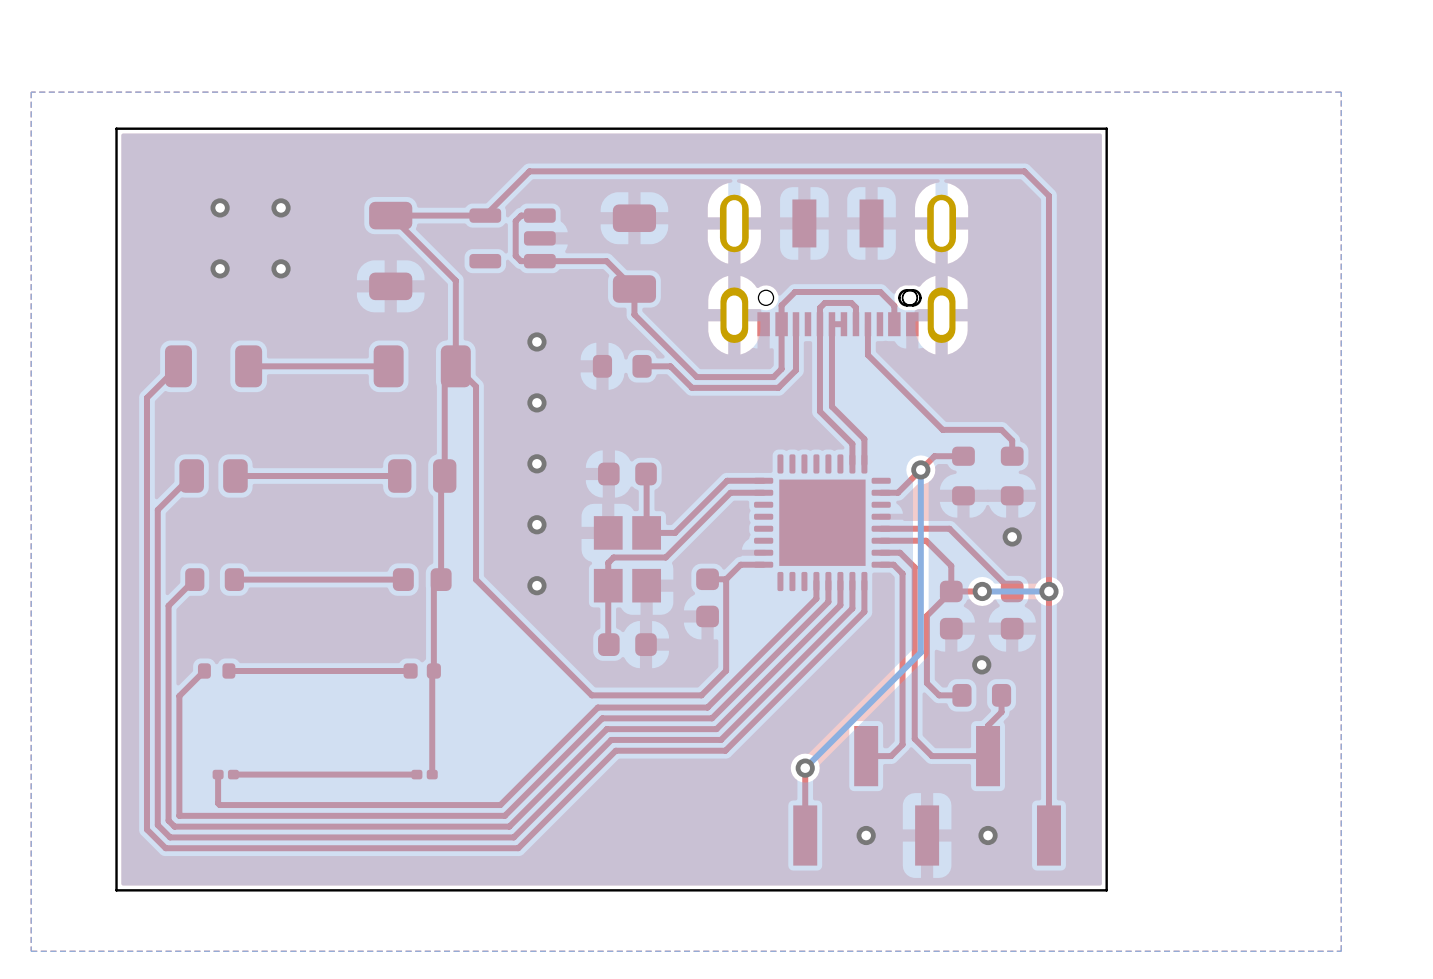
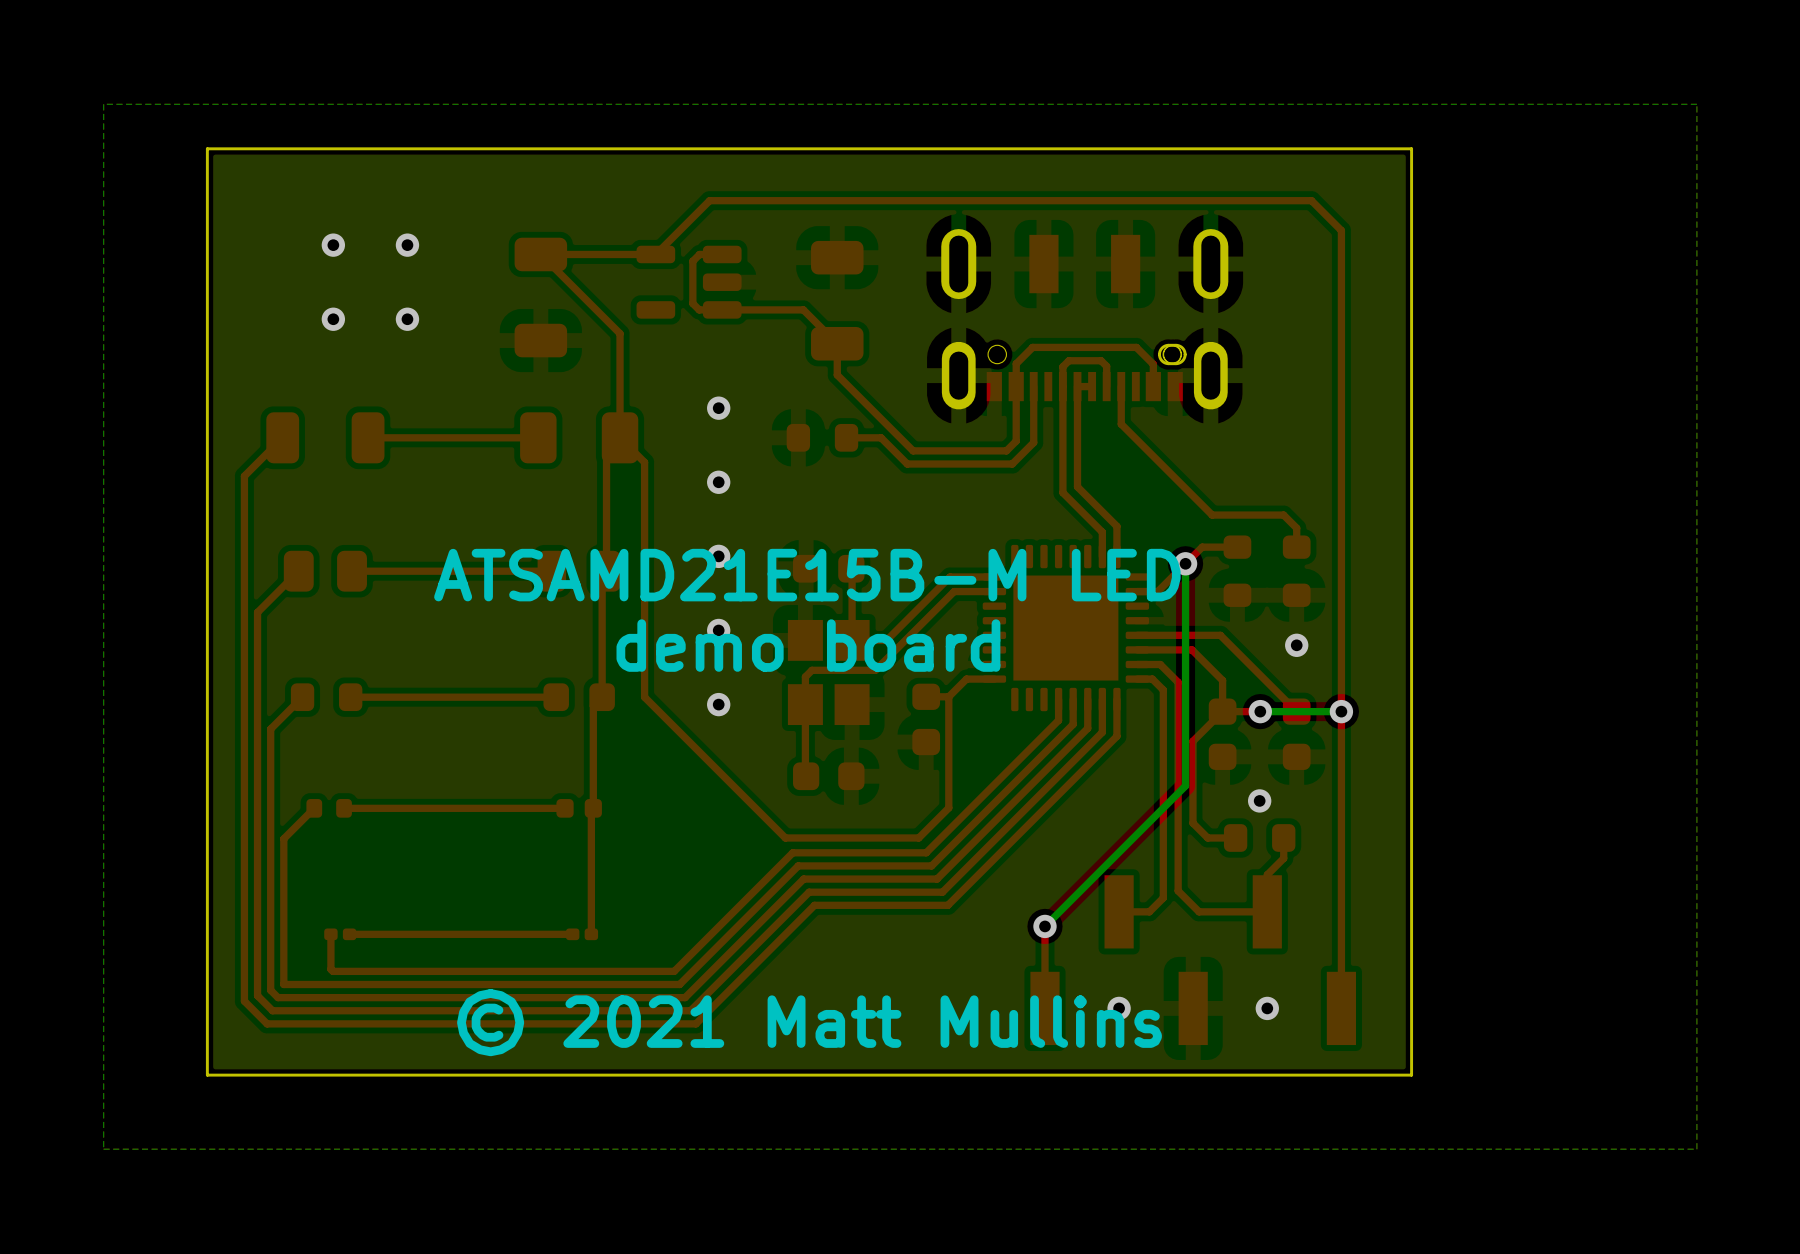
text: none -> ATSAMD21E15B-M LED (807, 575)
text: none -> demo board (808, 645)
text: none -> © 2021 Matt Mullins (809, 1022)

